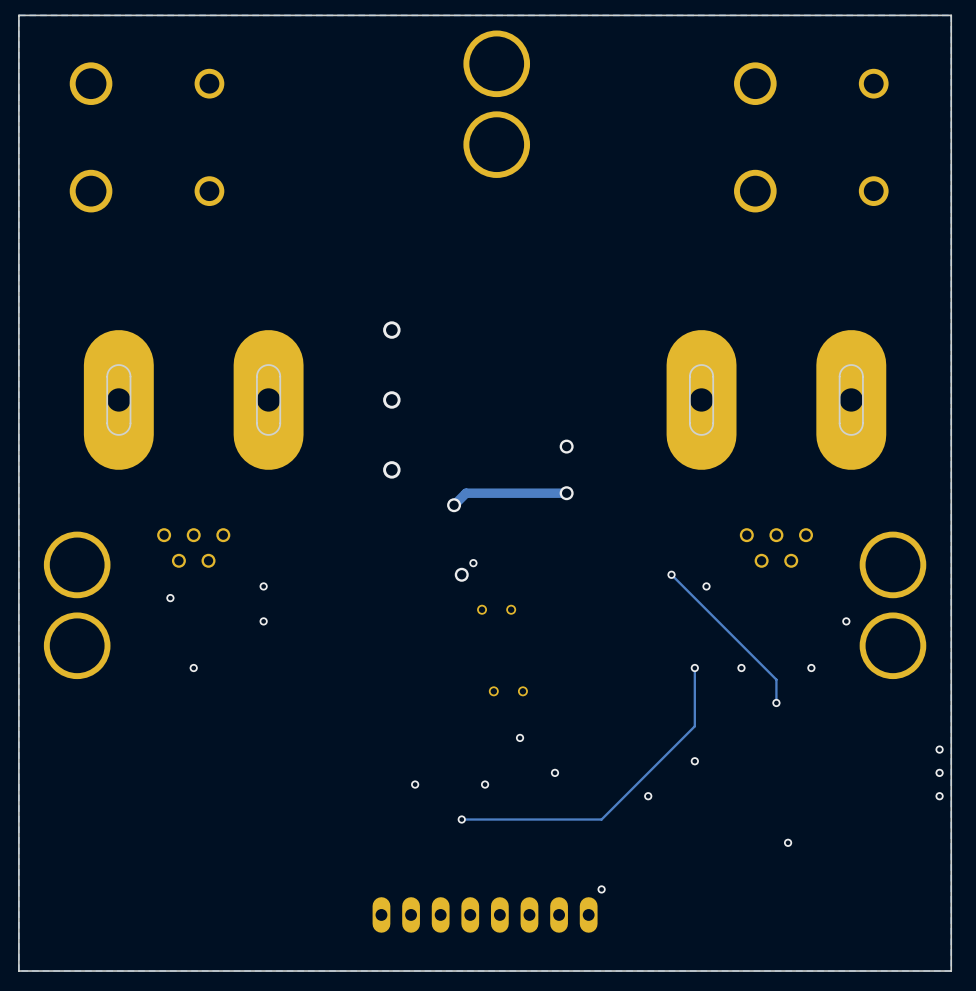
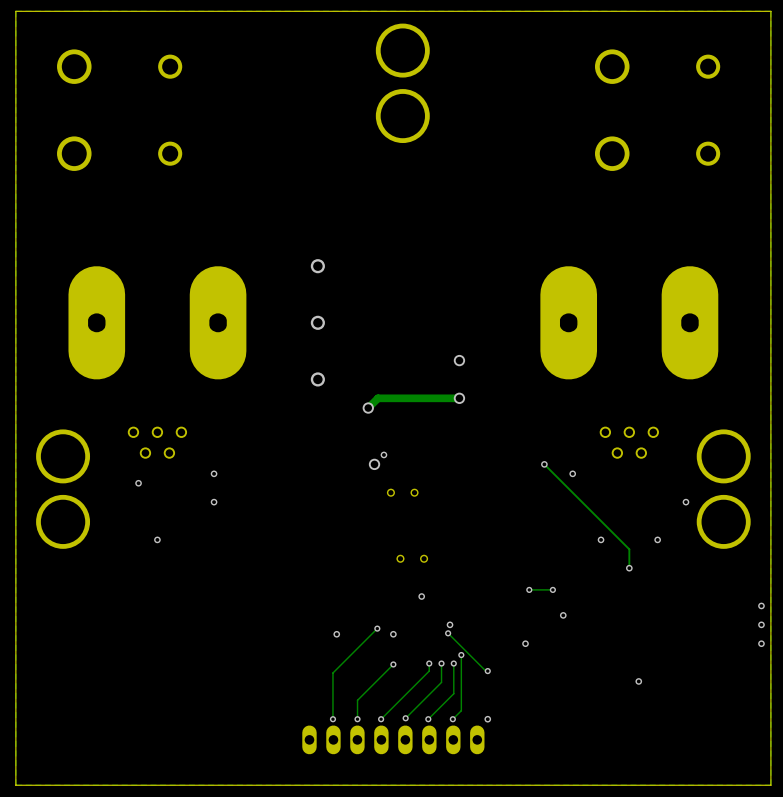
track: (694, 668) (694, 726) (601, 819) (461, 819) -> none
via: (694, 668) -> none
via: none -> (529, 589)
track: none -> (552, 589) (529, 589)
via: none -> (552, 589)
track: none -> (377, 628) (332, 672) (332, 719)
via: none -> (377, 628)
track: none -> (448, 633) (487, 671)
via: none -> (448, 633)
track: none -> (461, 655) (461, 710) (452, 719)
via: none -> (461, 655)
via: (461, 819) -> none
track: none -> (429, 663) (429, 671) (381, 719)
via: none -> (429, 663)
track: none -> (441, 663) (441, 682) (405, 718)
via: none -> (441, 663)
track: none -> (453, 663) (453, 693) (428, 719)
via: none -> (453, 663)
track: none -> (393, 664) (357, 700) (357, 719)
via: none -> (393, 664)
via: none -> (487, 671)
via: none -> (405, 718)
via: none -> (332, 719)
via: none -> (357, 719)
via: none -> (381, 719)
via: none -> (428, 719)
via: none -> (452, 719)

